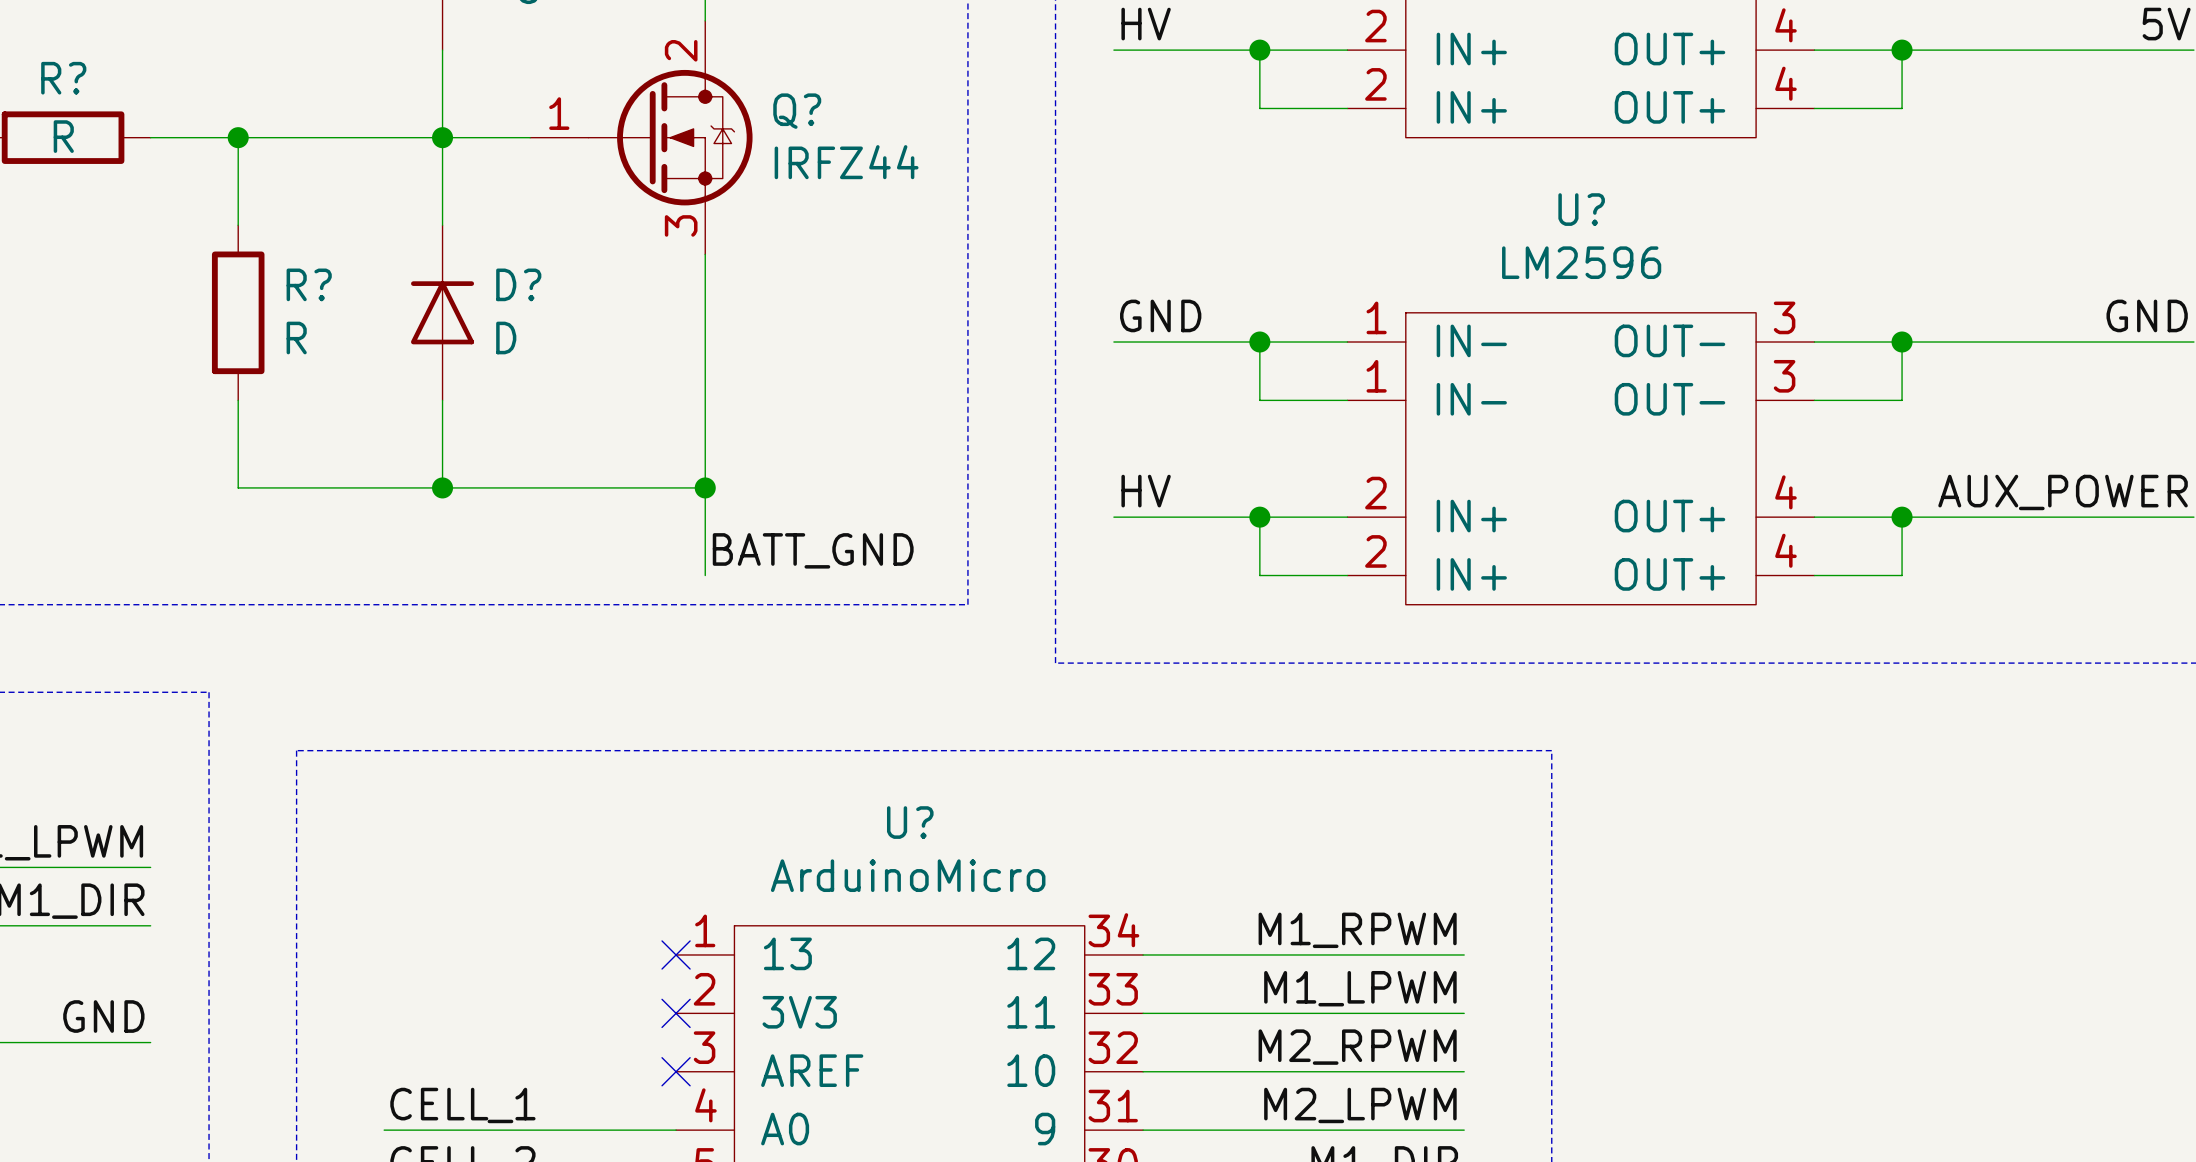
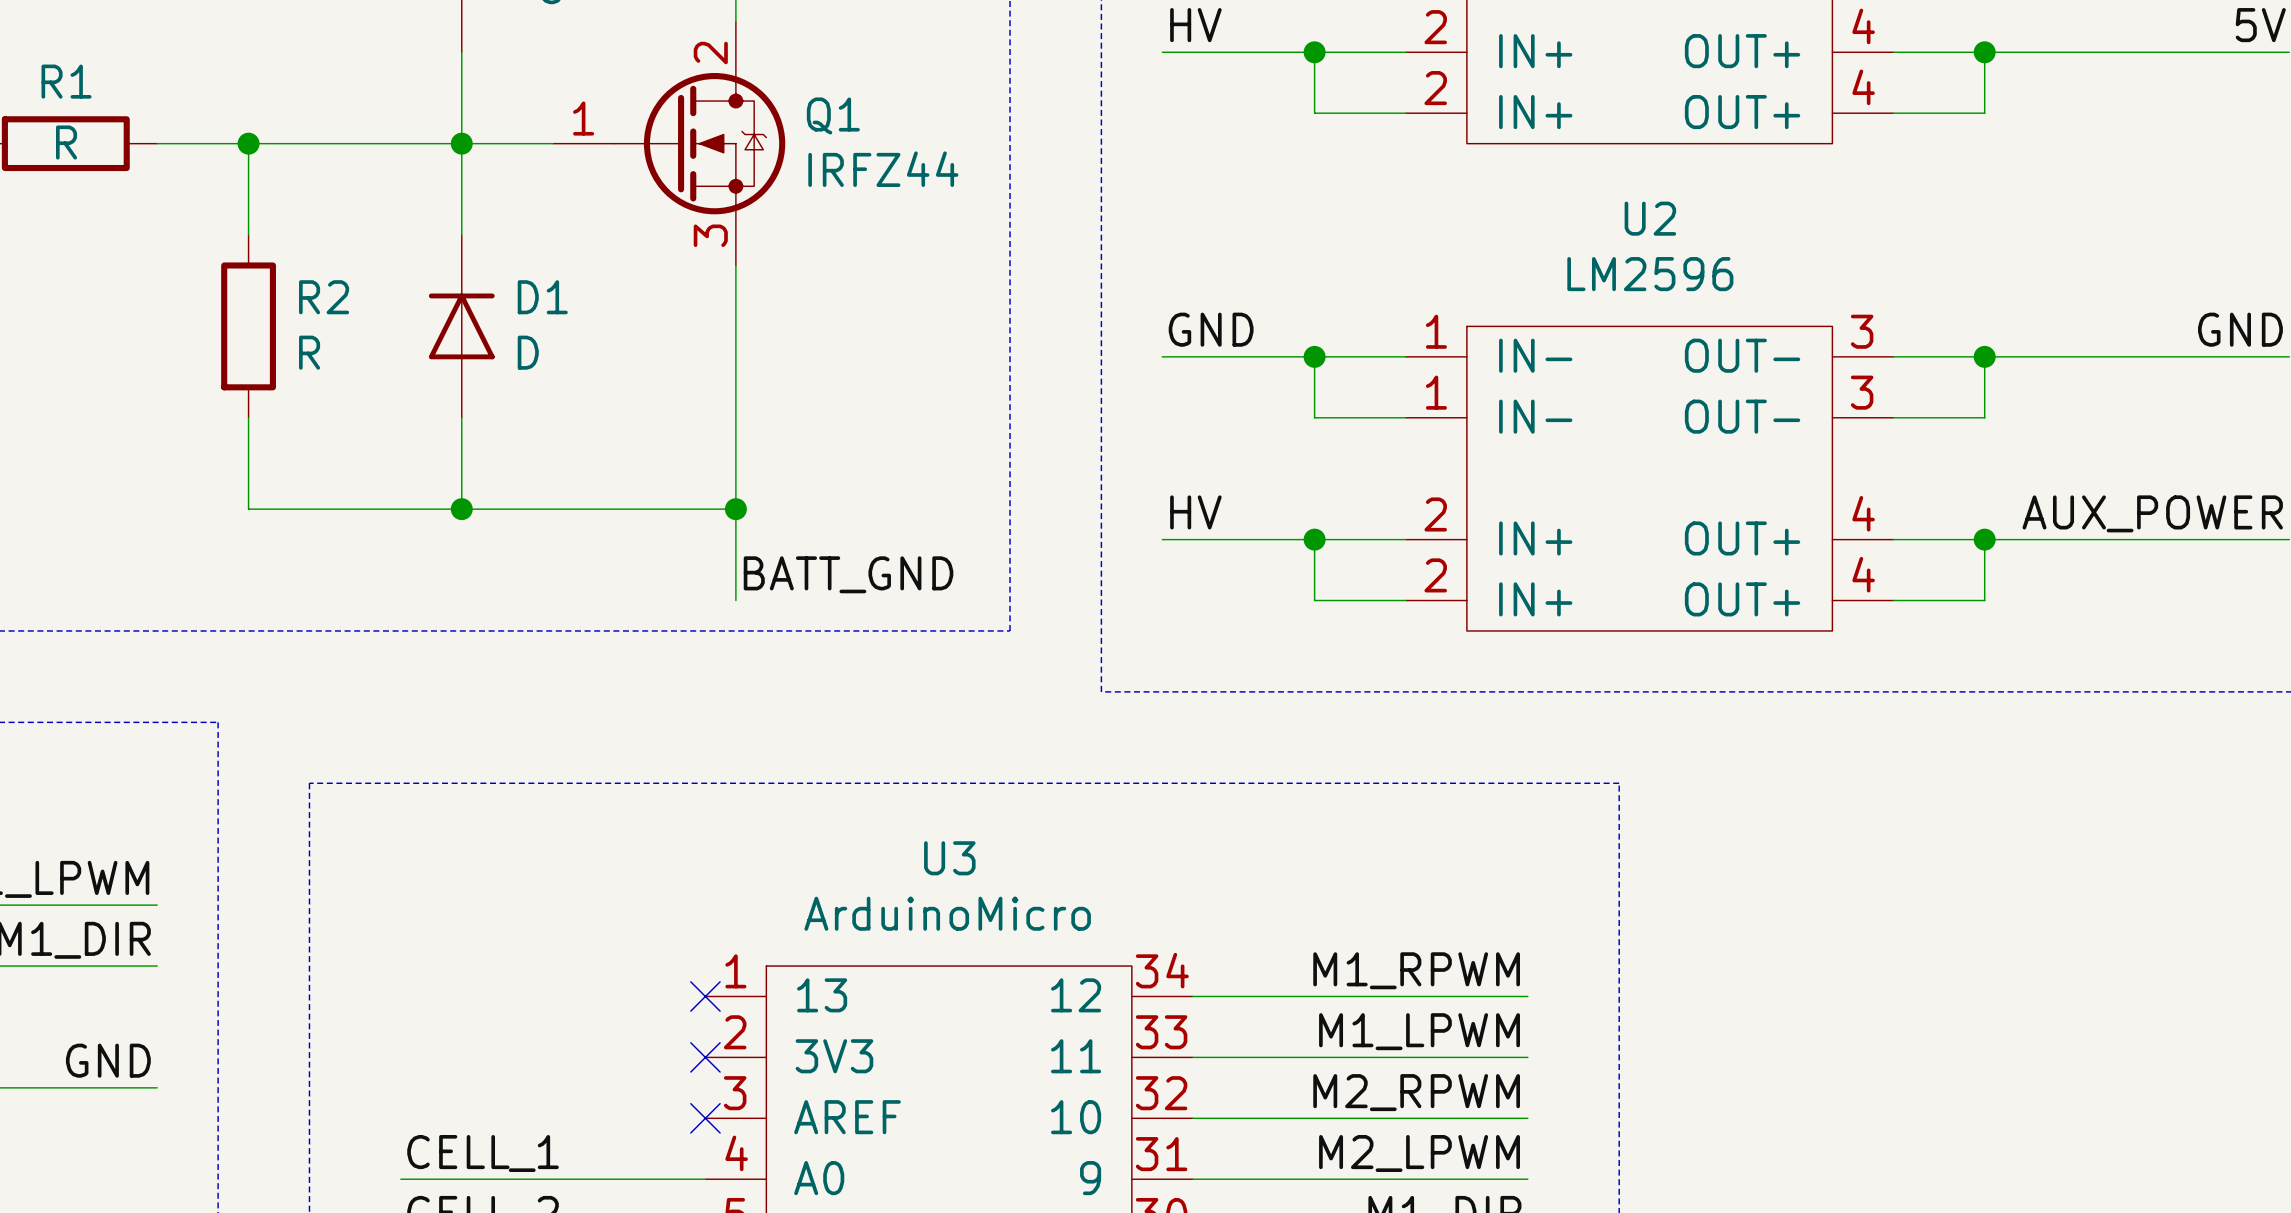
R? name: R? (63, 78) -> R1 (66, 81)
Q? name: Q? (797, 111) -> Q1 (833, 115)
U? name: U? (1581, 209) -> U2 (1650, 218)
R? name: R? (309, 284) -> R2 (324, 297)
D? name: D? (518, 284) -> D1 (542, 297)
U? name: U? (910, 822) -> U3 (949, 858)

